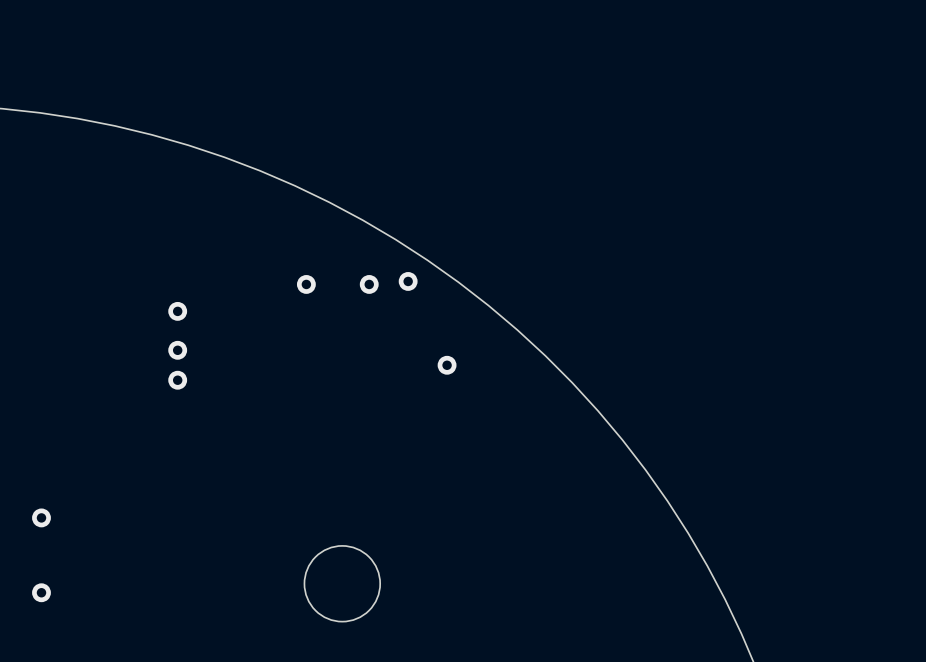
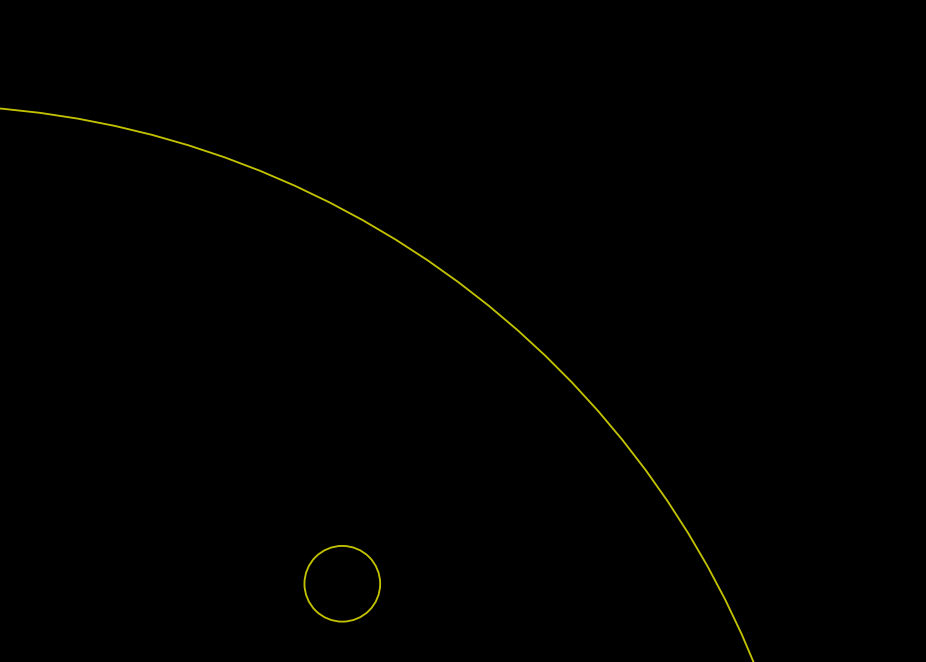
via: (408, 281) -> none
via: (306, 284) -> none
via: (369, 284) -> none
via: (177, 311) -> none
via: (177, 350) -> none
via: (447, 365) -> none
via: (177, 380) -> none
via: (41, 517) -> none
via: (41, 592) -> none

